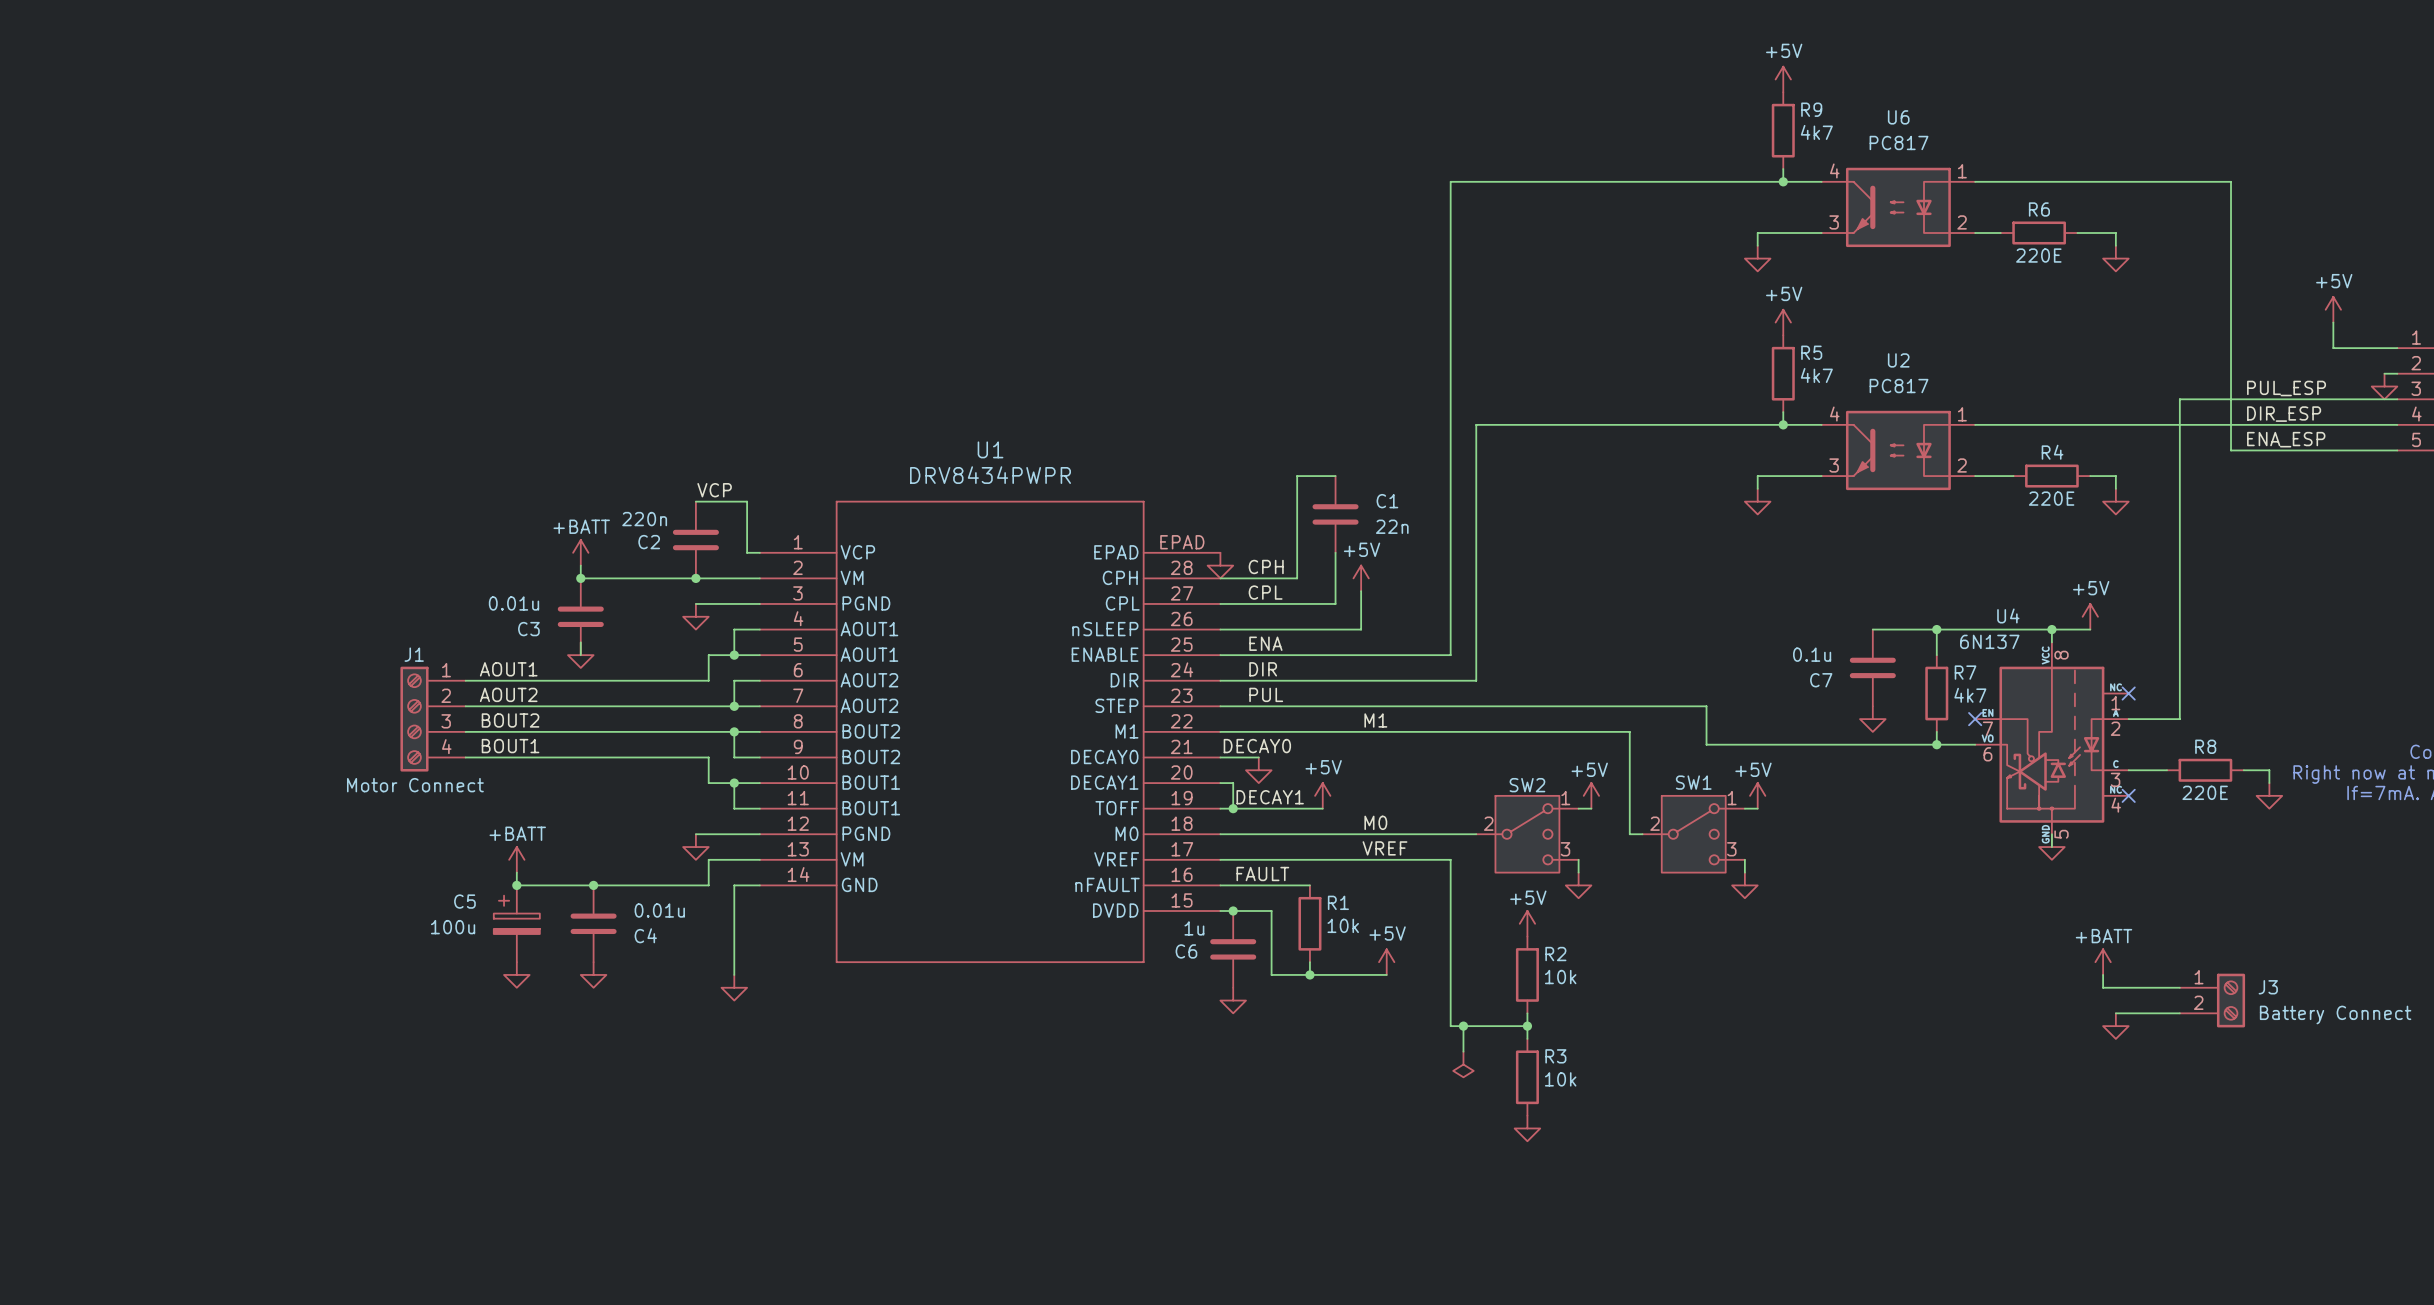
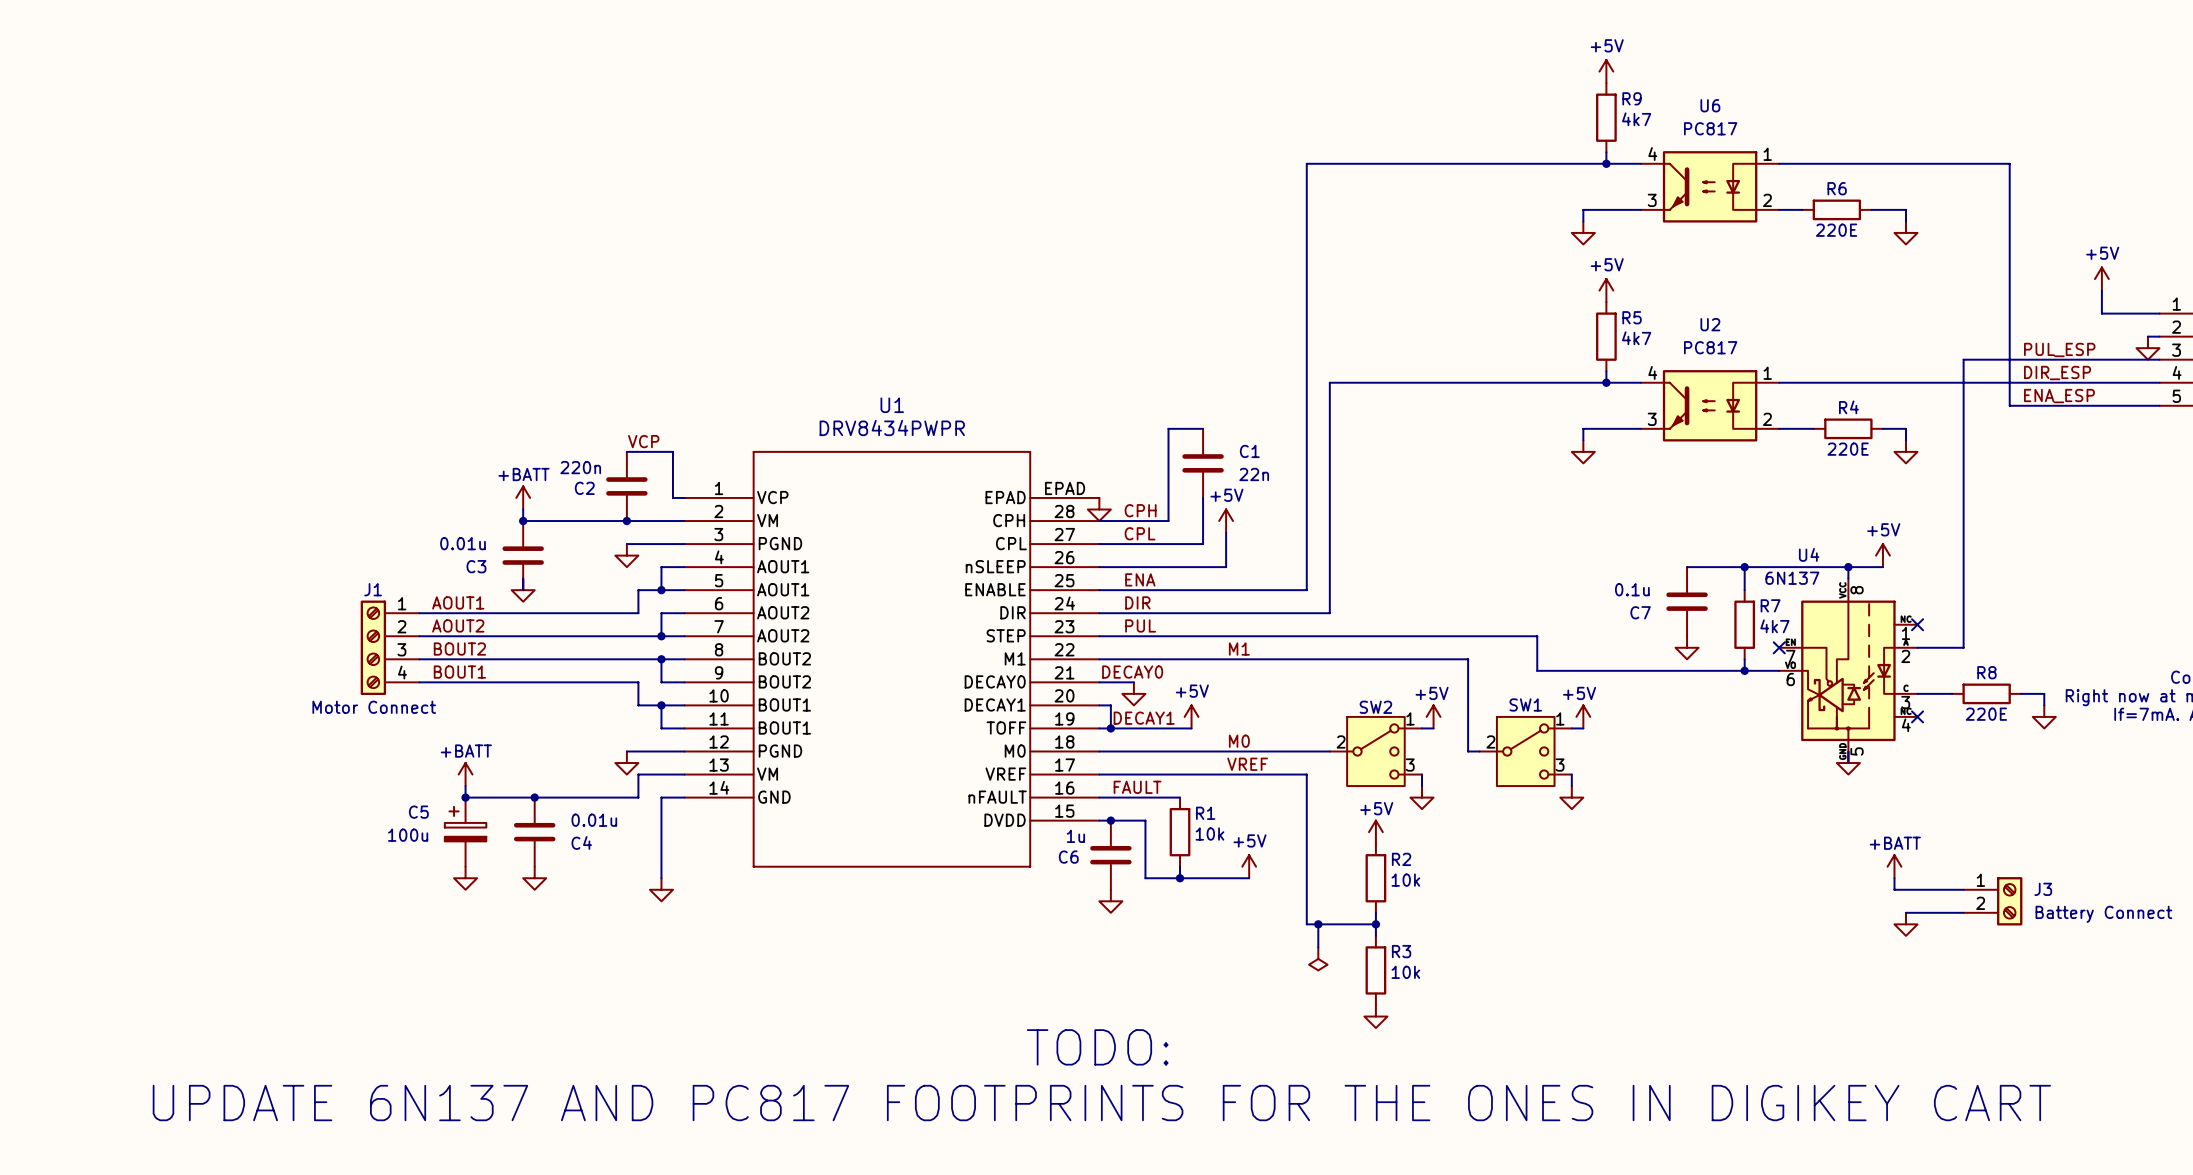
text: none -> TODO: (1097, 1047)
text: none -> UPDATE 6N137 AND PC817 FOOTPRINTS FOR THE ONES IN DIGIKEY CART (1101, 1103)

